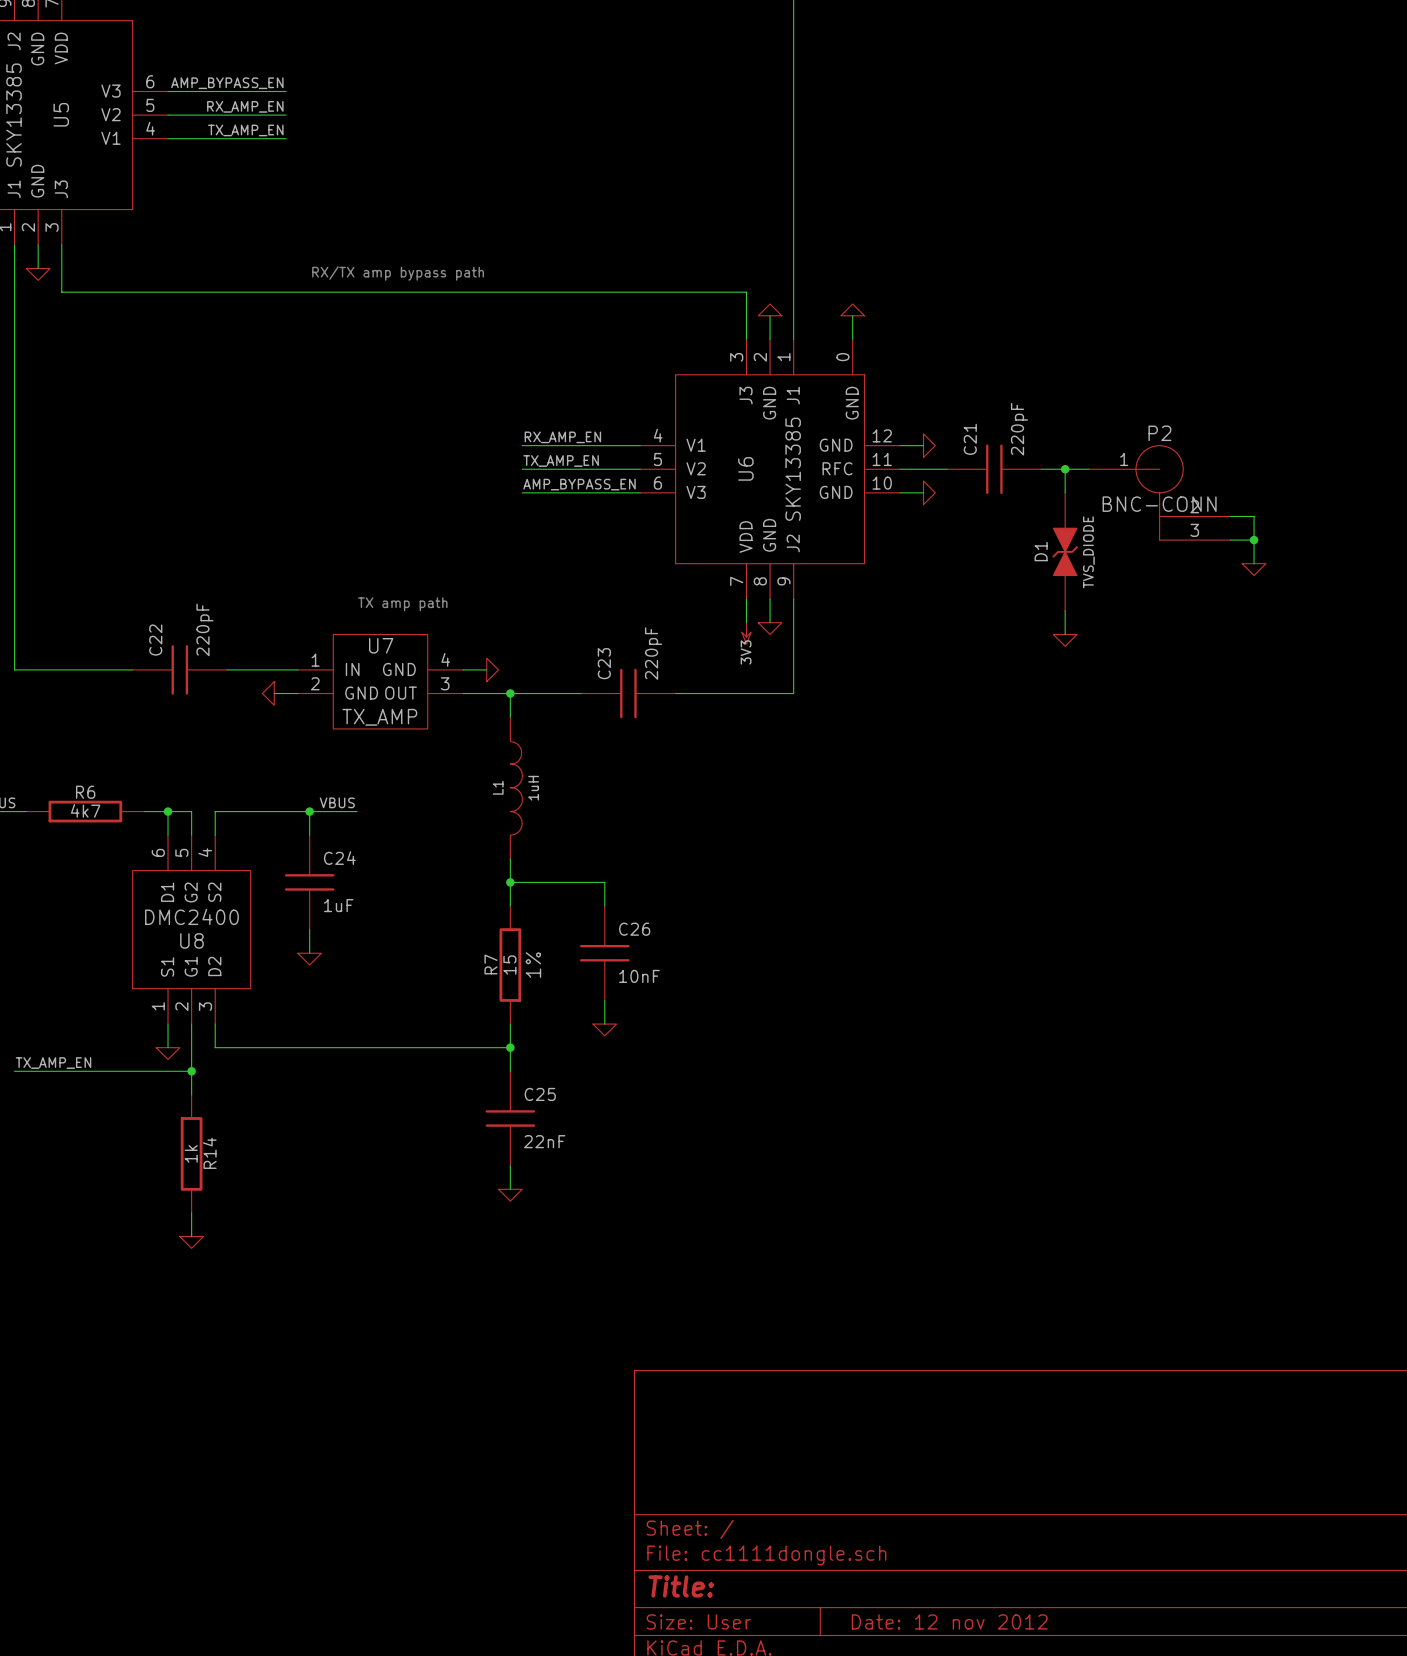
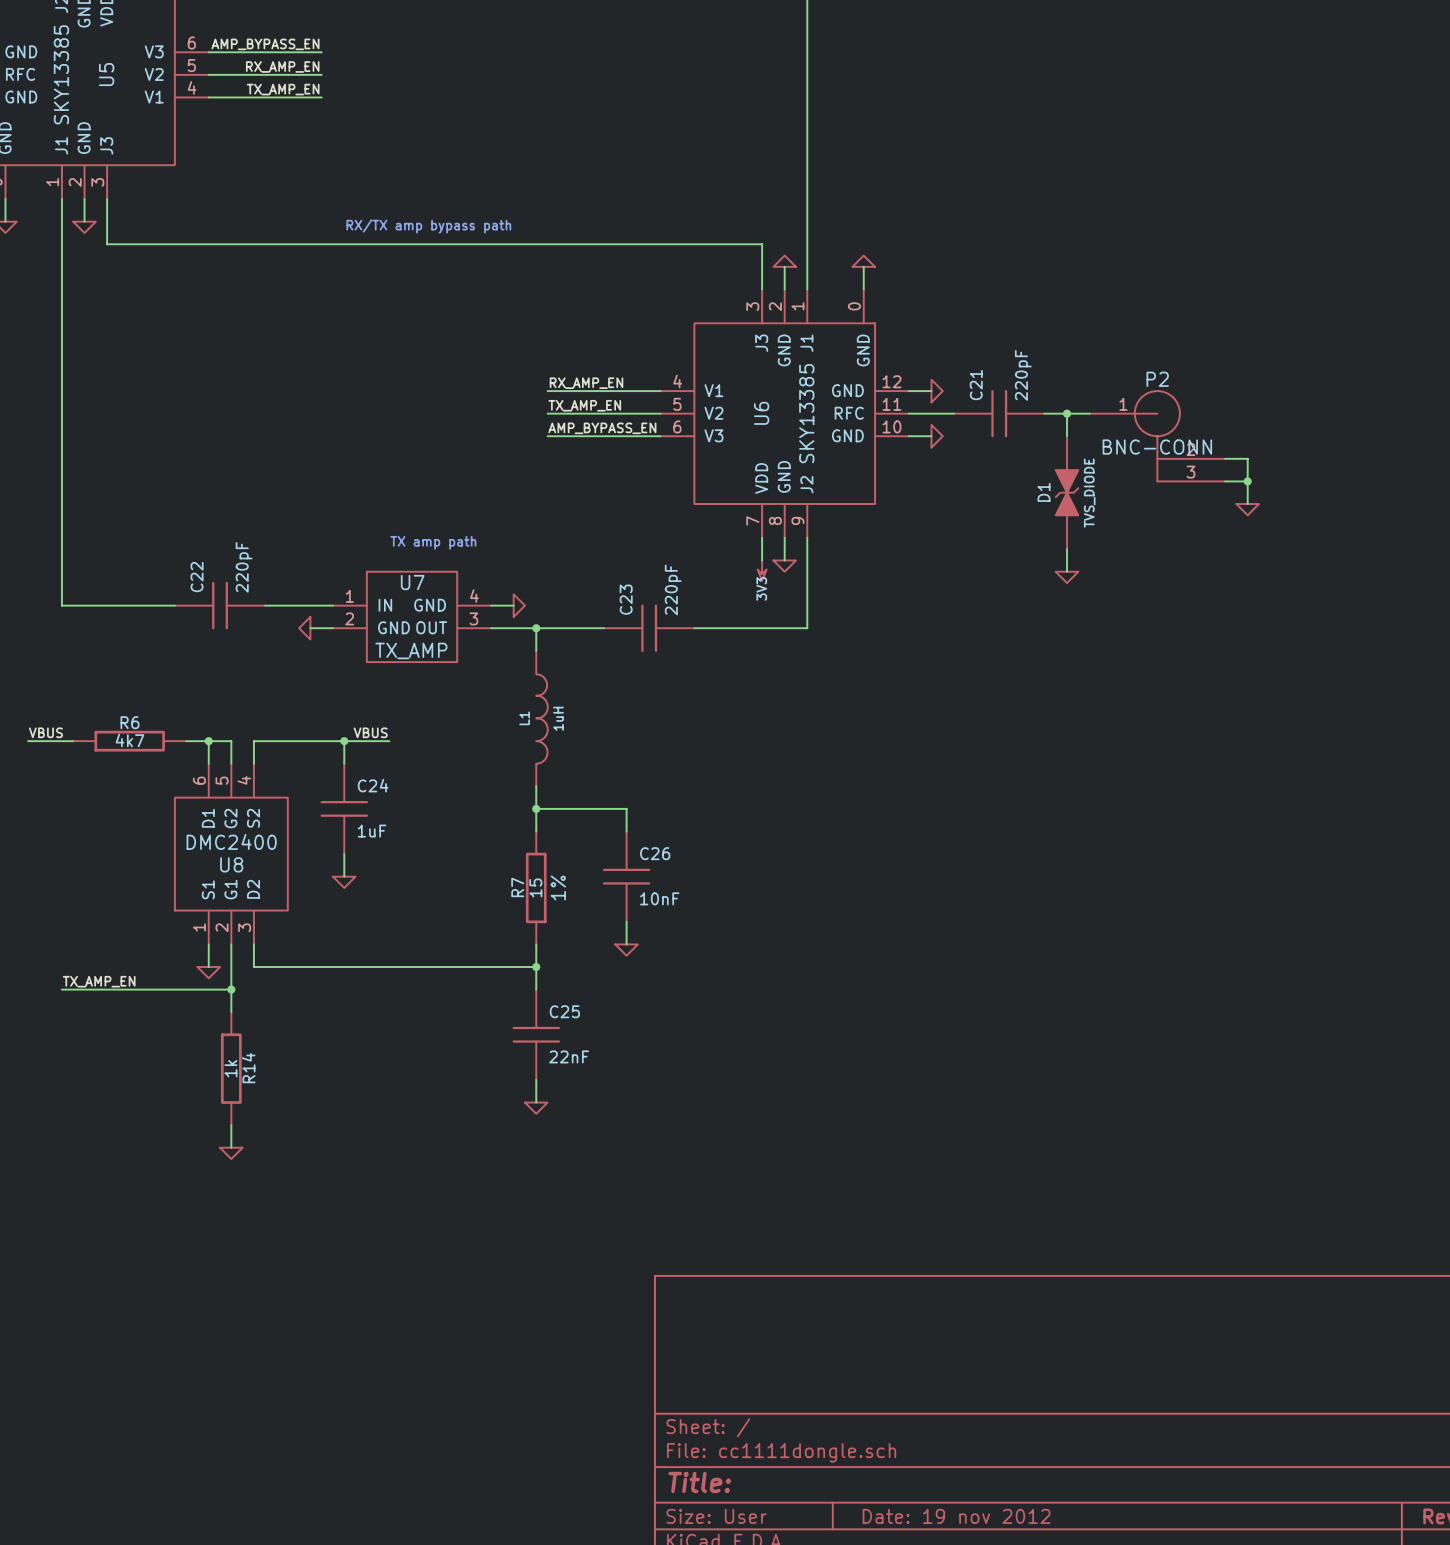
title block: Date: 12 nov 2012 (949, 1621) -> Date: 19 nov 2012 (956, 1516)

